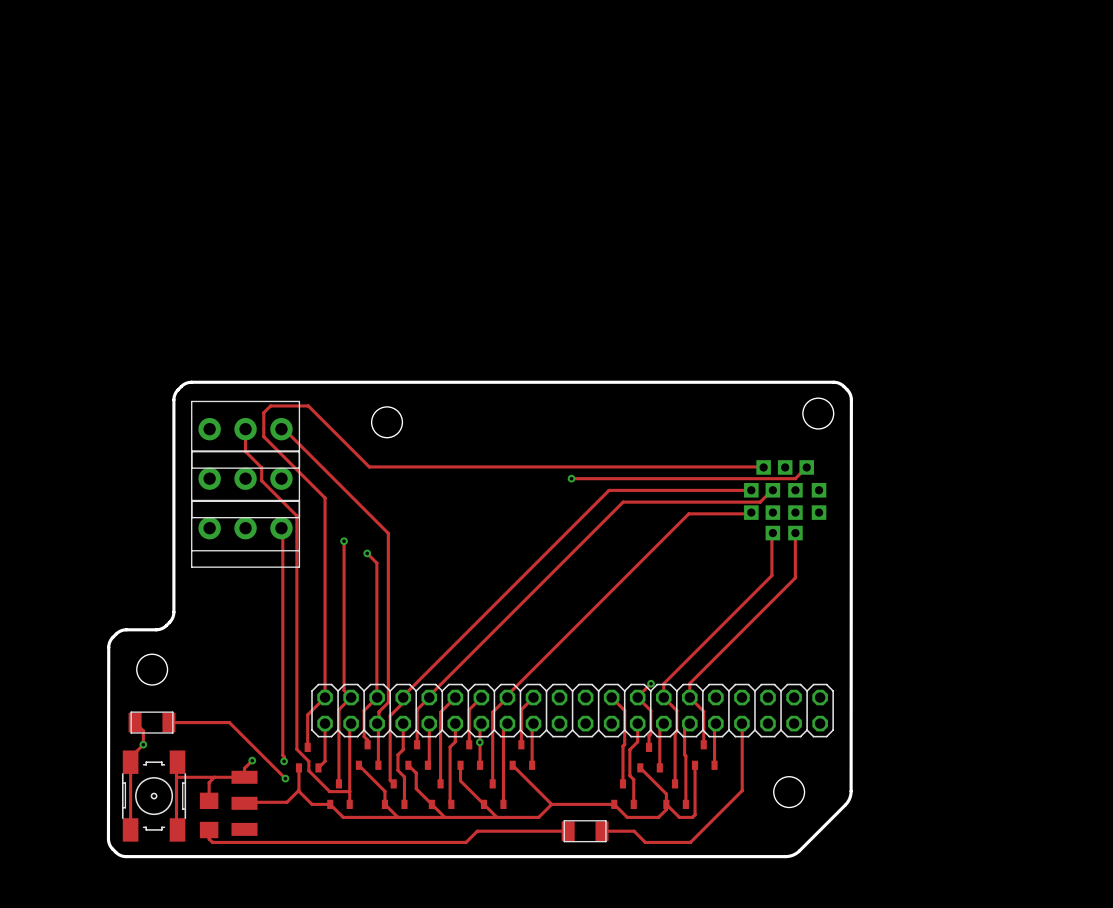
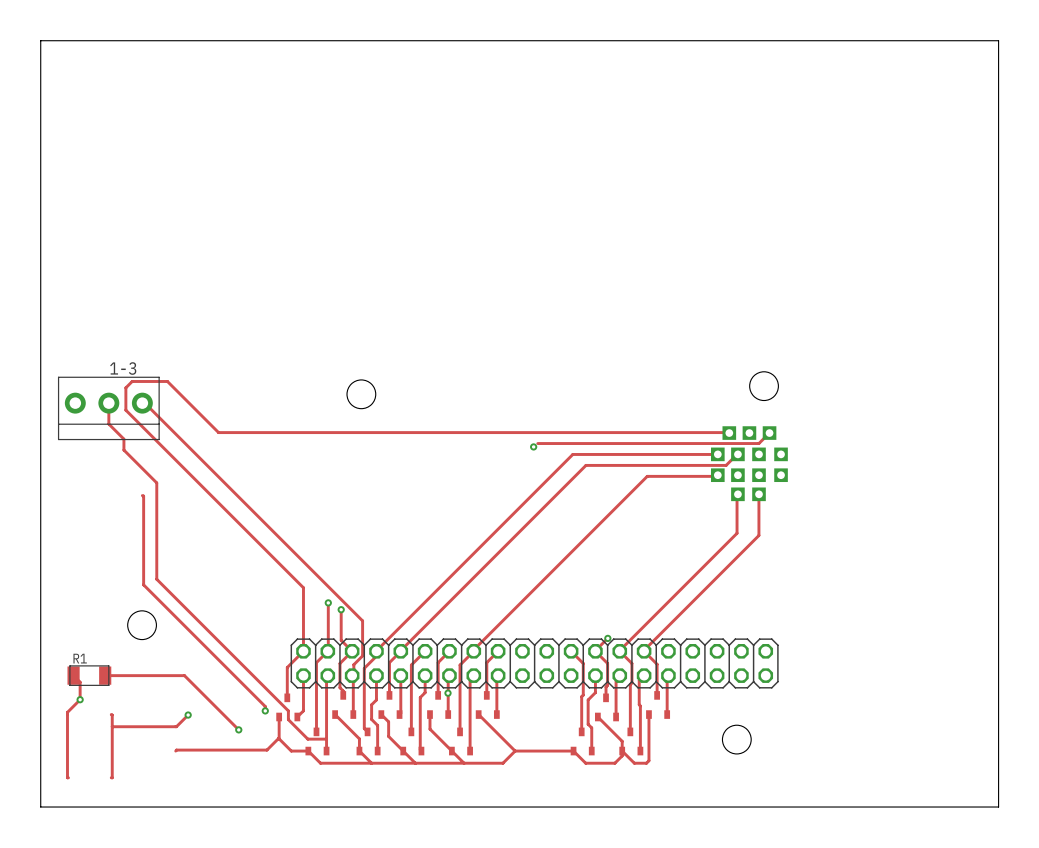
board edge: none -> (40, 40) (998, 40) (998, 807) (40, 807) (40, 40)
board edge: (191, 382) (833, 382) (841, 384) (848, 391) (851, 399) (851, 791) (847, 802) (799, 850) (788, 856) (126, 856) (118, 854) (110, 846) (108, 838) (108, 645) (111, 638) (120, 630) (159, 629) (166, 625) (173, 615) (174, 398) (181, 386) (191, 382) -> none
track: (245, 429) (245, 451) (261, 467) (261, 480) (296, 515) (296, 749) -> (108, 403) (108, 424) (123, 439) (123, 450) (156, 482) (156, 579) (277, 699)
track: (281, 429) (282, 427) (388, 533) (388, 664) -> (142, 403) (143, 401) (362, 620)
part: (245, 434) -> none
1-3: none -> (108, 408)
track: none -> (769, 433) (758, 443) (537, 443)
track: (763, 467) (369, 466) (308, 405) (270, 405) (263, 412) (263, 436) (325, 497) (325, 629) -> (729, 433) (218, 432) (167, 381) (132, 381) (125, 387) (125, 410) (303, 587)
track: (806, 467) (795, 478) (571, 478) -> none
part: (245, 484) -> none
track: (751, 490) (609, 490) (404, 695) -> (717, 454) (572, 454) (377, 649)
track: (772, 490) (760, 502) (623, 502) (430, 695) -> (737, 454) (726, 465) (585, 465) (402, 649)
part position: (785, 500) -> (749, 463)
track: (751, 512) (688, 513) (507, 695) -> (717, 475) (647, 476) (474, 649)
track: (281, 528) (282, 755) -> (142, 495) (143, 584) (264, 705)
part: (245, 533) -> none
track: (772, 533) (771, 575) (663, 683) (663, 697) -> (737, 494) (737, 533) (619, 651)
track: (795, 533) (795, 577) (689, 683) (689, 697) -> (759, 494) (758, 535) (644, 651)
track: (344, 541) (344, 690) (351, 697) -> (328, 602) (327, 651)
via: (344, 541) -> none
track: (367, 553) (376, 563) (376, 697) -> (341, 609) (341, 640) (351, 651)
via: (367, 553) -> none
via: none -> (328, 602)
via: none -> (341, 609)
track: (135, 722) (143, 730) (143, 744) (130, 757) (131, 829) -> none
part: (152, 722) -> none
track: (168, 722) (229, 722) (285, 778) -> none
track: none -> (73, 675) (80, 682) (80, 699) (67, 712) (68, 777)
R1: none -> (89, 675)
track: none -> (105, 675) (184, 675) (238, 729)
track: (741, 723) (742, 790) (690, 842) (645, 842) (634, 831) (602, 831) -> none
via: (143, 744) -> none
via: none -> (80, 699)
track: (252, 760) (244, 768) (244, 777) (176, 777) -> none
via: (252, 760) -> none
track: (177, 762) (177, 829) -> none
track: none -> (111, 714) (111, 777)
track: none -> (188, 715) (176, 726) (112, 726)
via: none -> (188, 715)
track: (214, 777) (209, 782) (209, 800) -> none
via: (285, 778) -> none
via: none -> (238, 729)
part: (154, 796) -> none
track: (286, 802) (244, 803) -> (267, 749) (175, 751)
part: (244, 803) -> none
part: (209, 815) -> none
track: (209, 830) (209, 838) (212, 842) (466, 842) (477, 831) (568, 831) -> none
part: (585, 831) -> none

